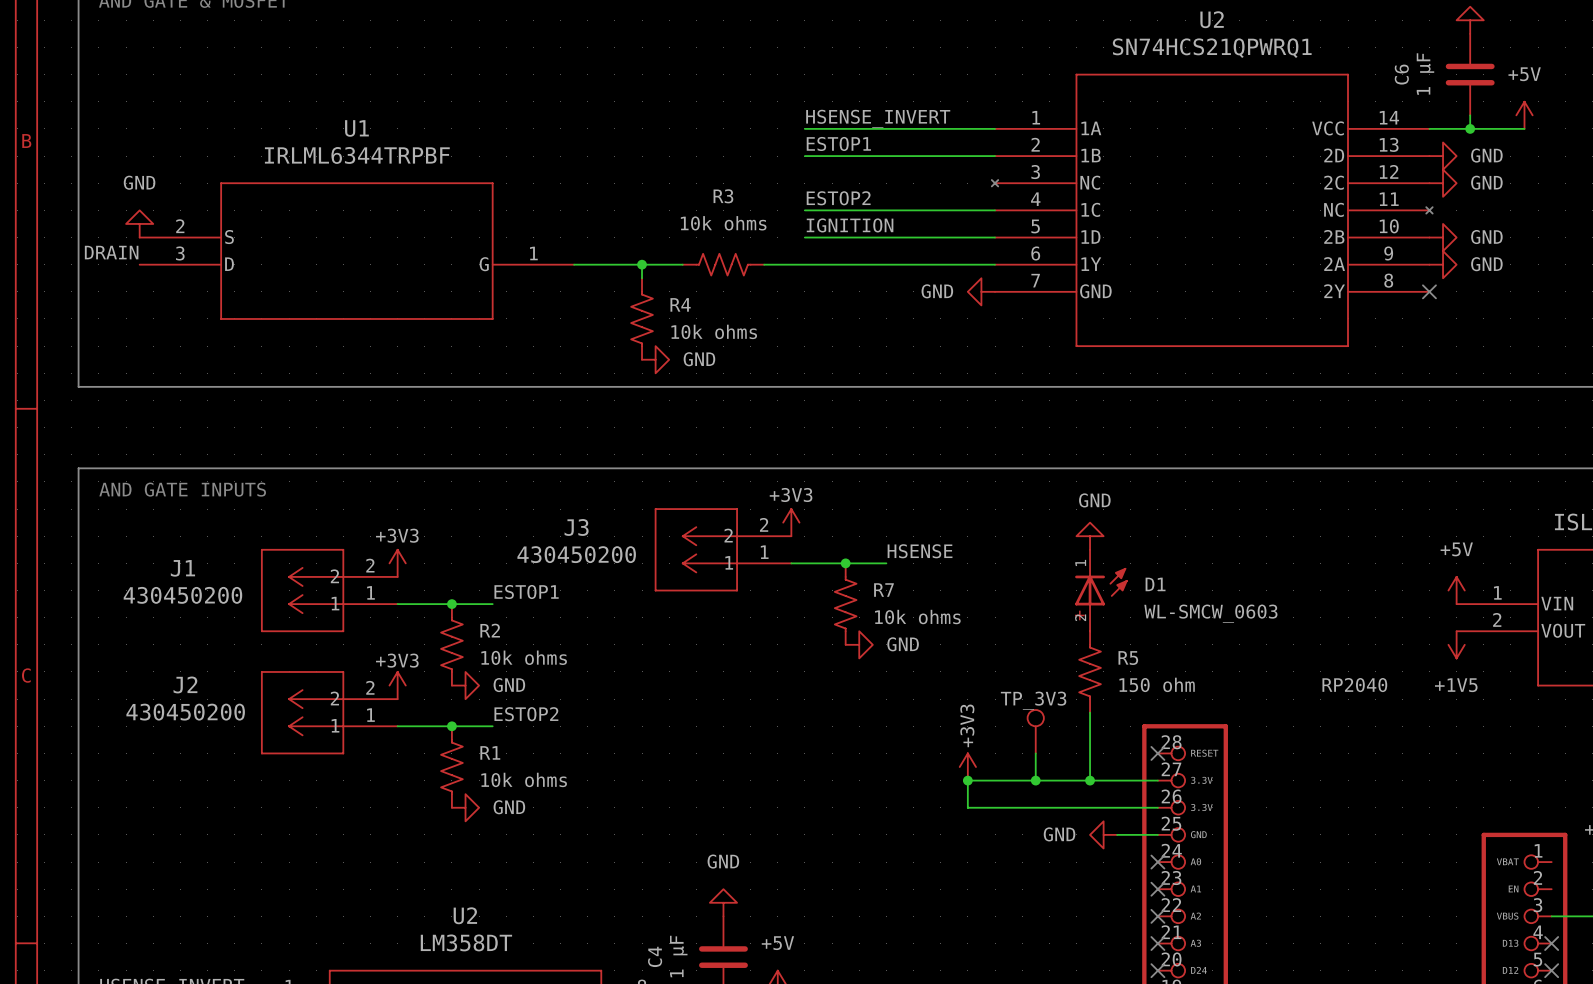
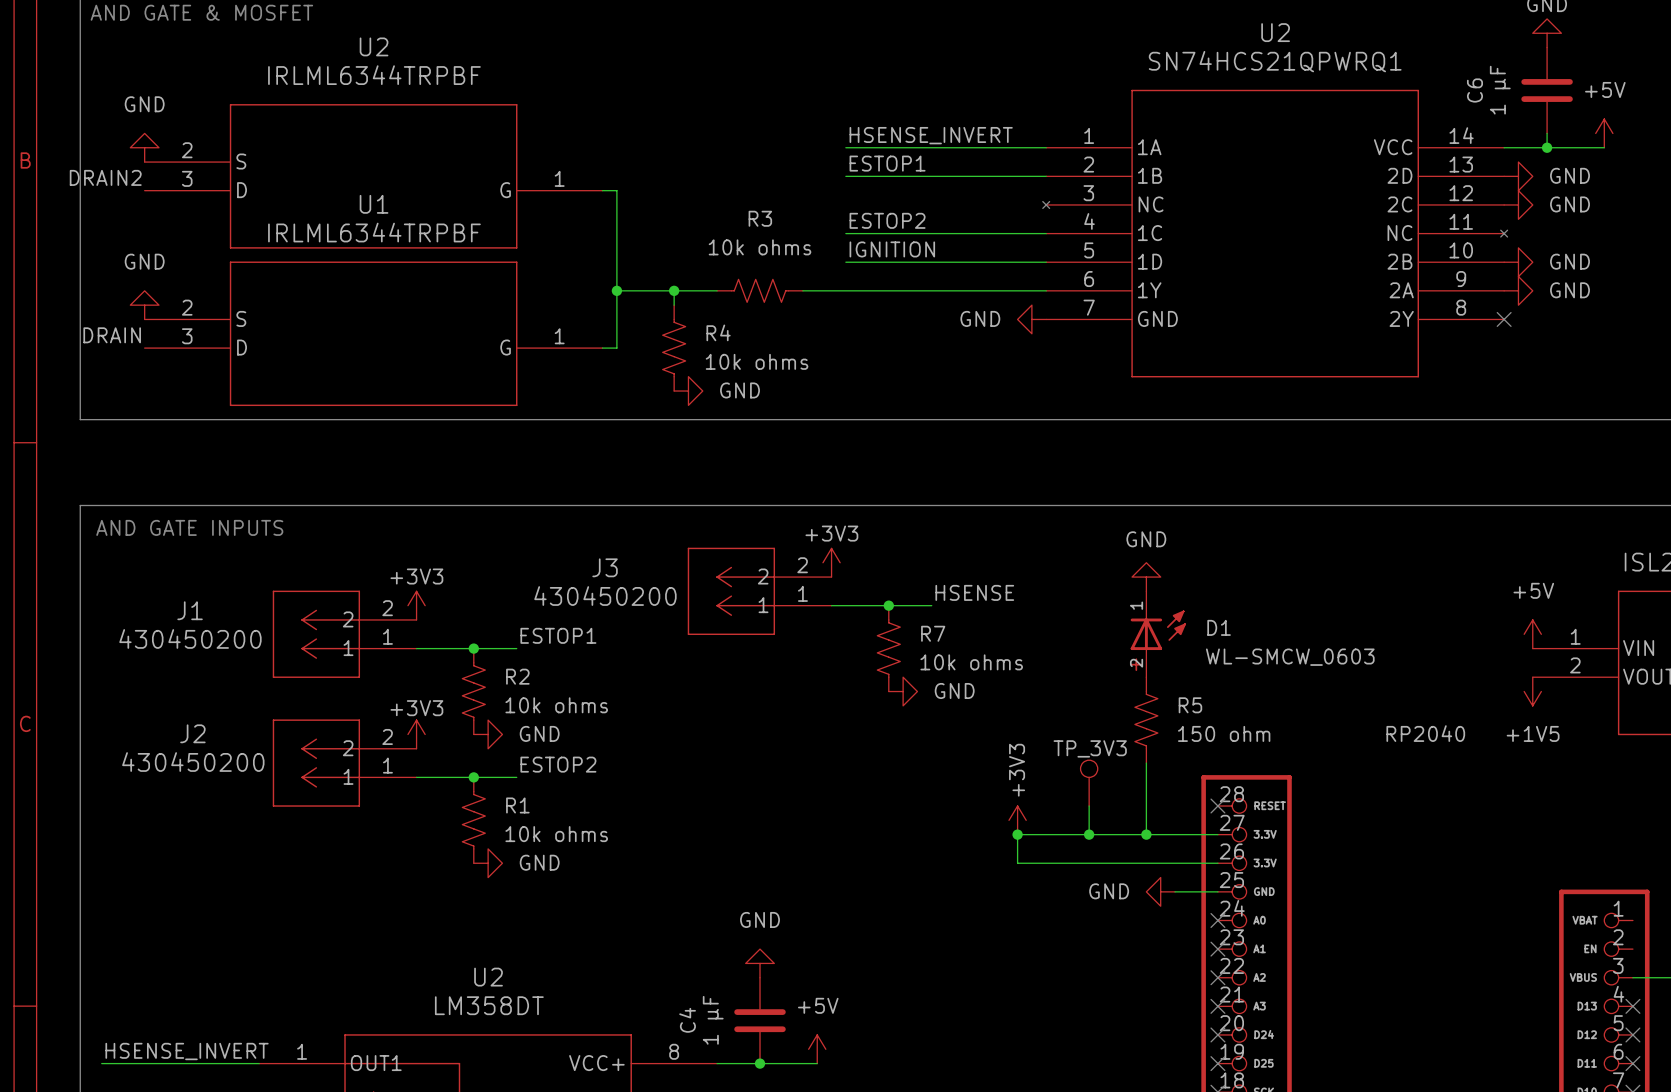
power symbol: none -> GND (144, 147)
U2: none -> IRLML6344TRPBF (373, 176)
label: none -> DRAIN2 (105, 177)
wire: none -> (602, 190) (616, 190) (616, 348) (602, 348)
power symbol: GND (139, 223) -> none
U1 position: (356, 251) -> (373, 333)
label position: DRAIN (111, 252) -> DRAIN (112, 335)
wire: (574, 264) (587, 264) -> none
junction: none -> (616, 290)
power symbol: none -> GND (144, 305)

